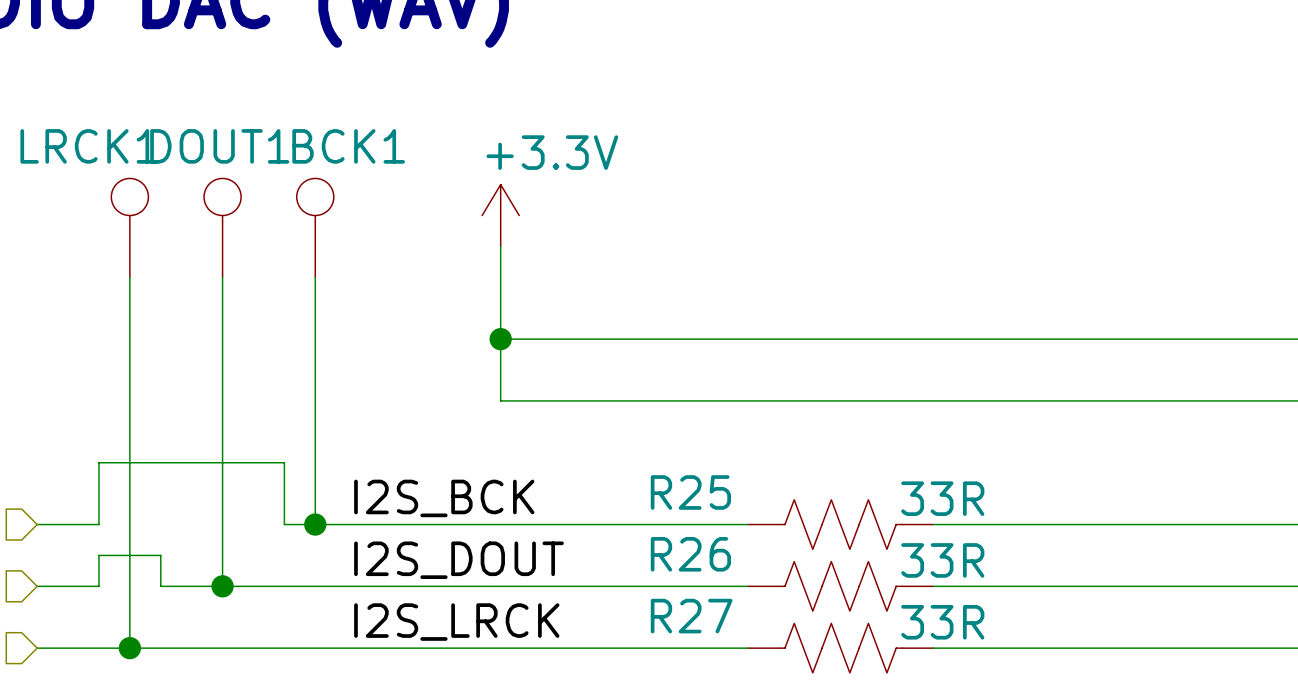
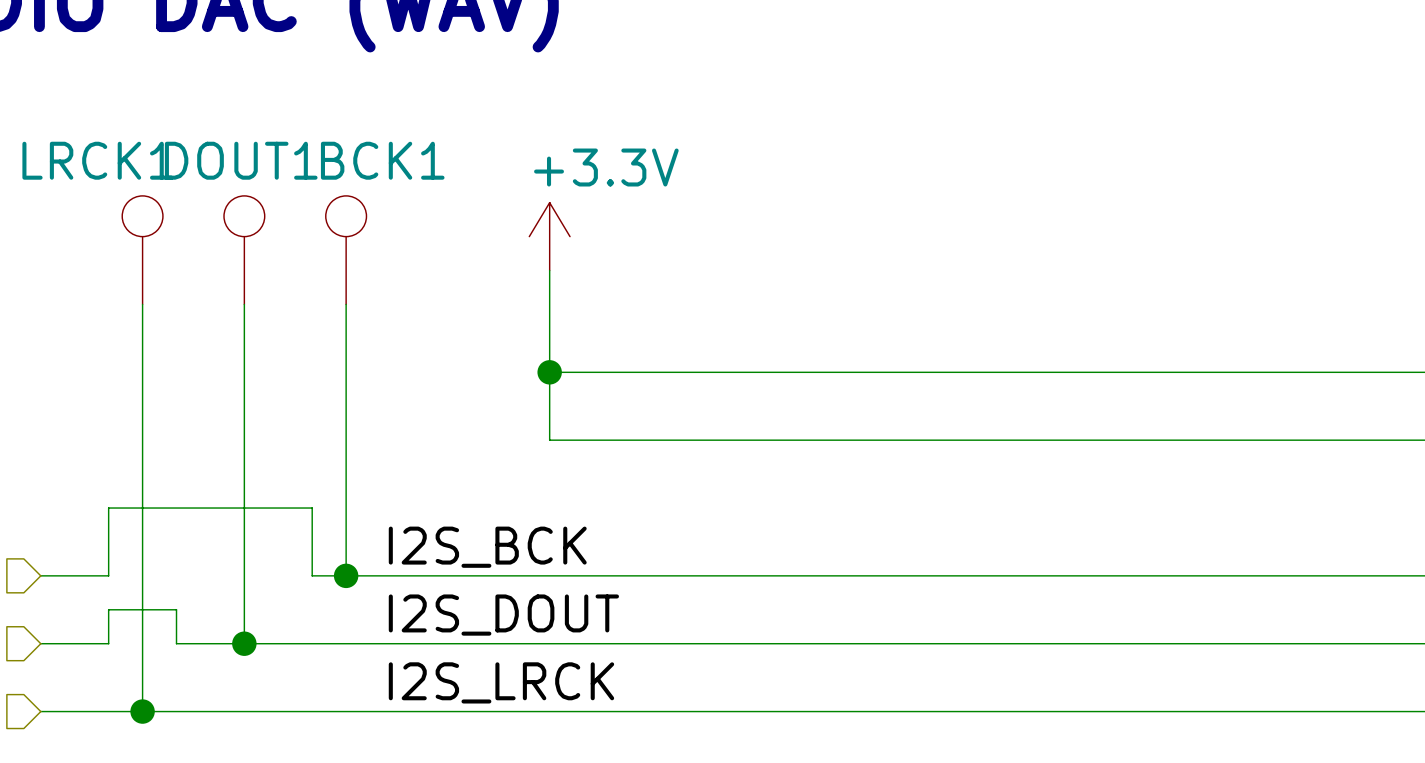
wire: none -> (821, 575) (1024, 575)
R25: 33R (840, 524) -> none
wire: none -> (821, 643) (1024, 643)
R26: 33R (840, 586) -> none
wire: none -> (821, 711) (1024, 711)
R27: 33R (840, 648) -> none

